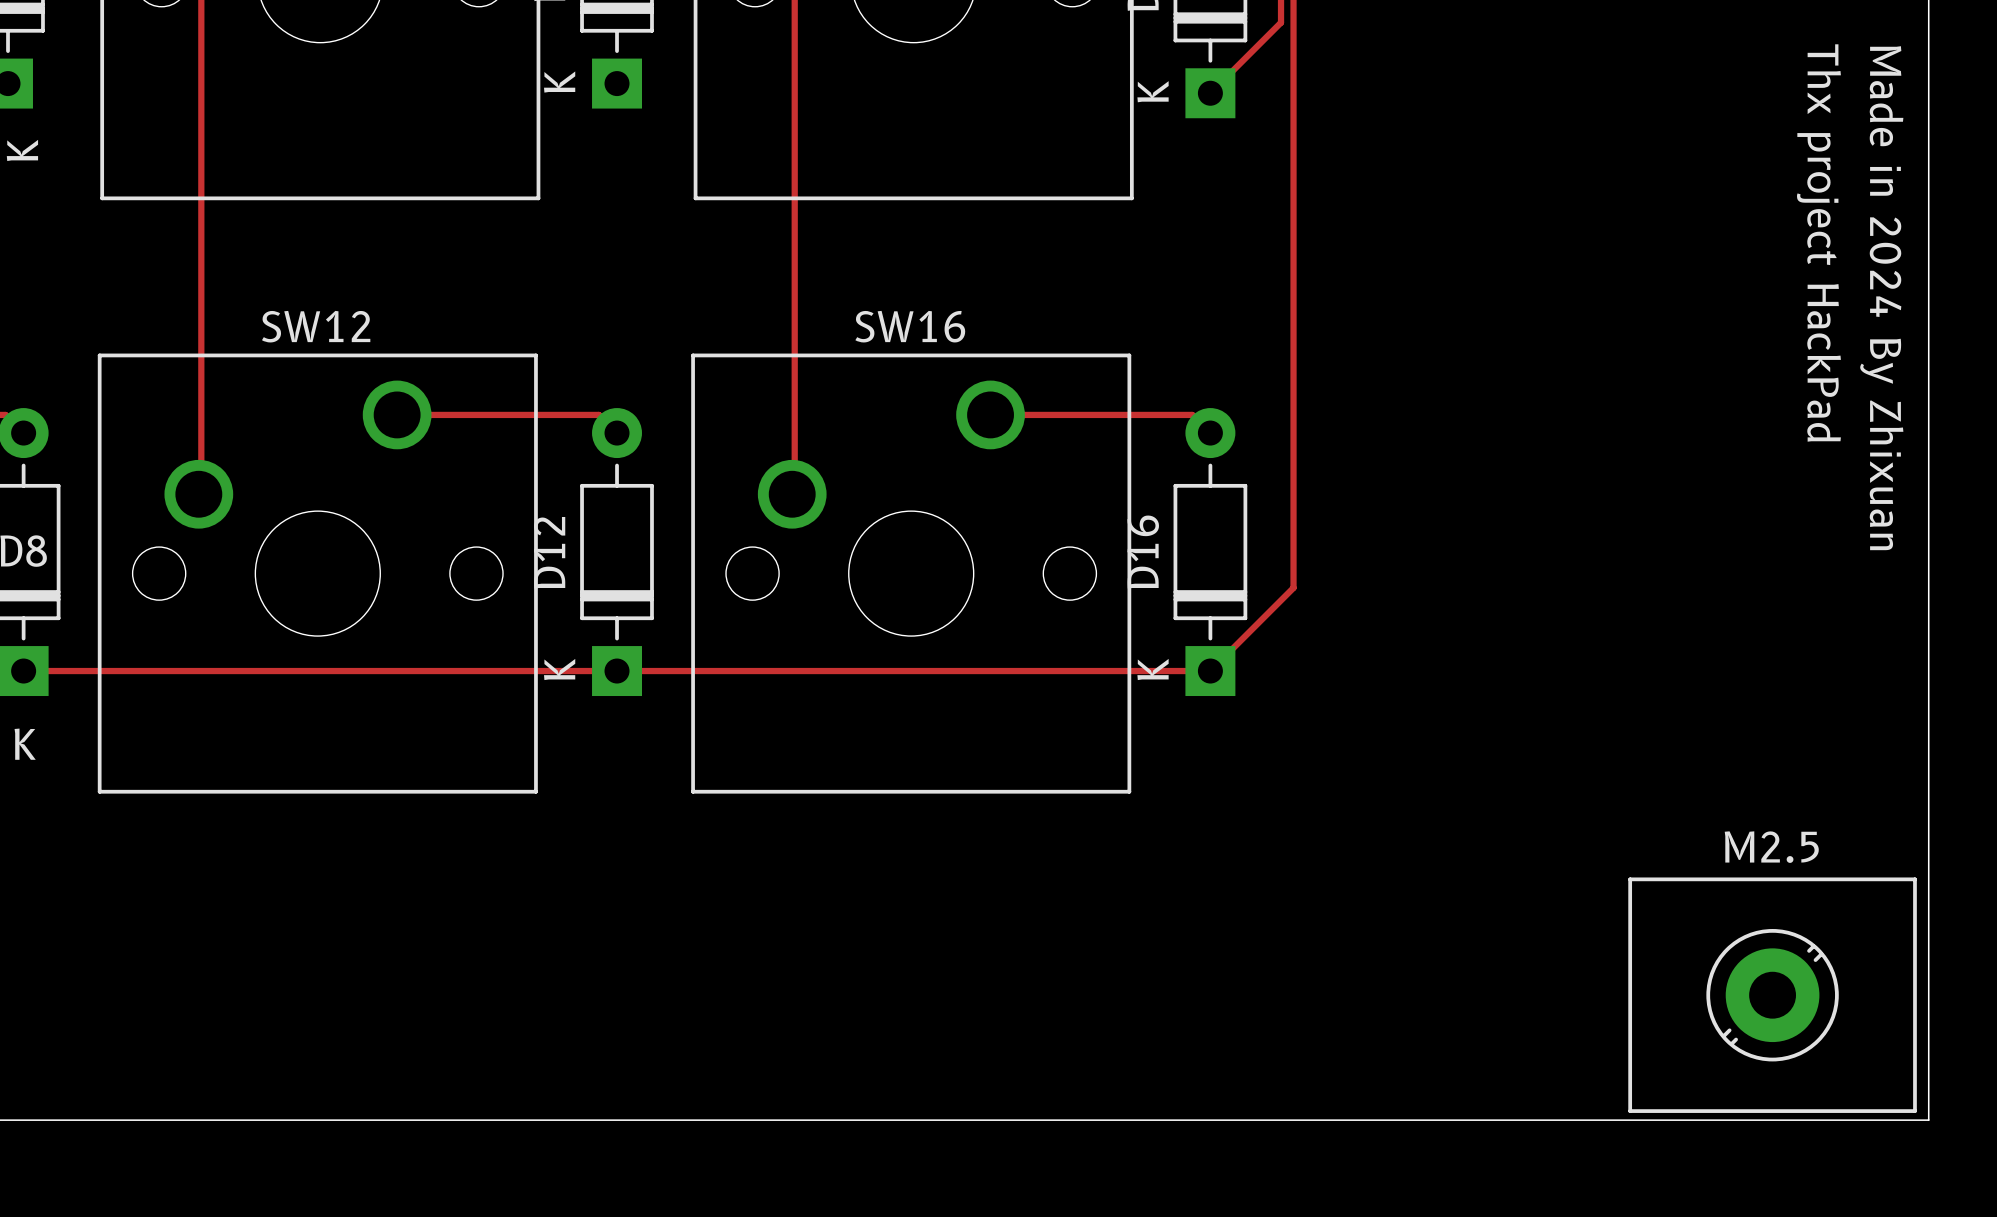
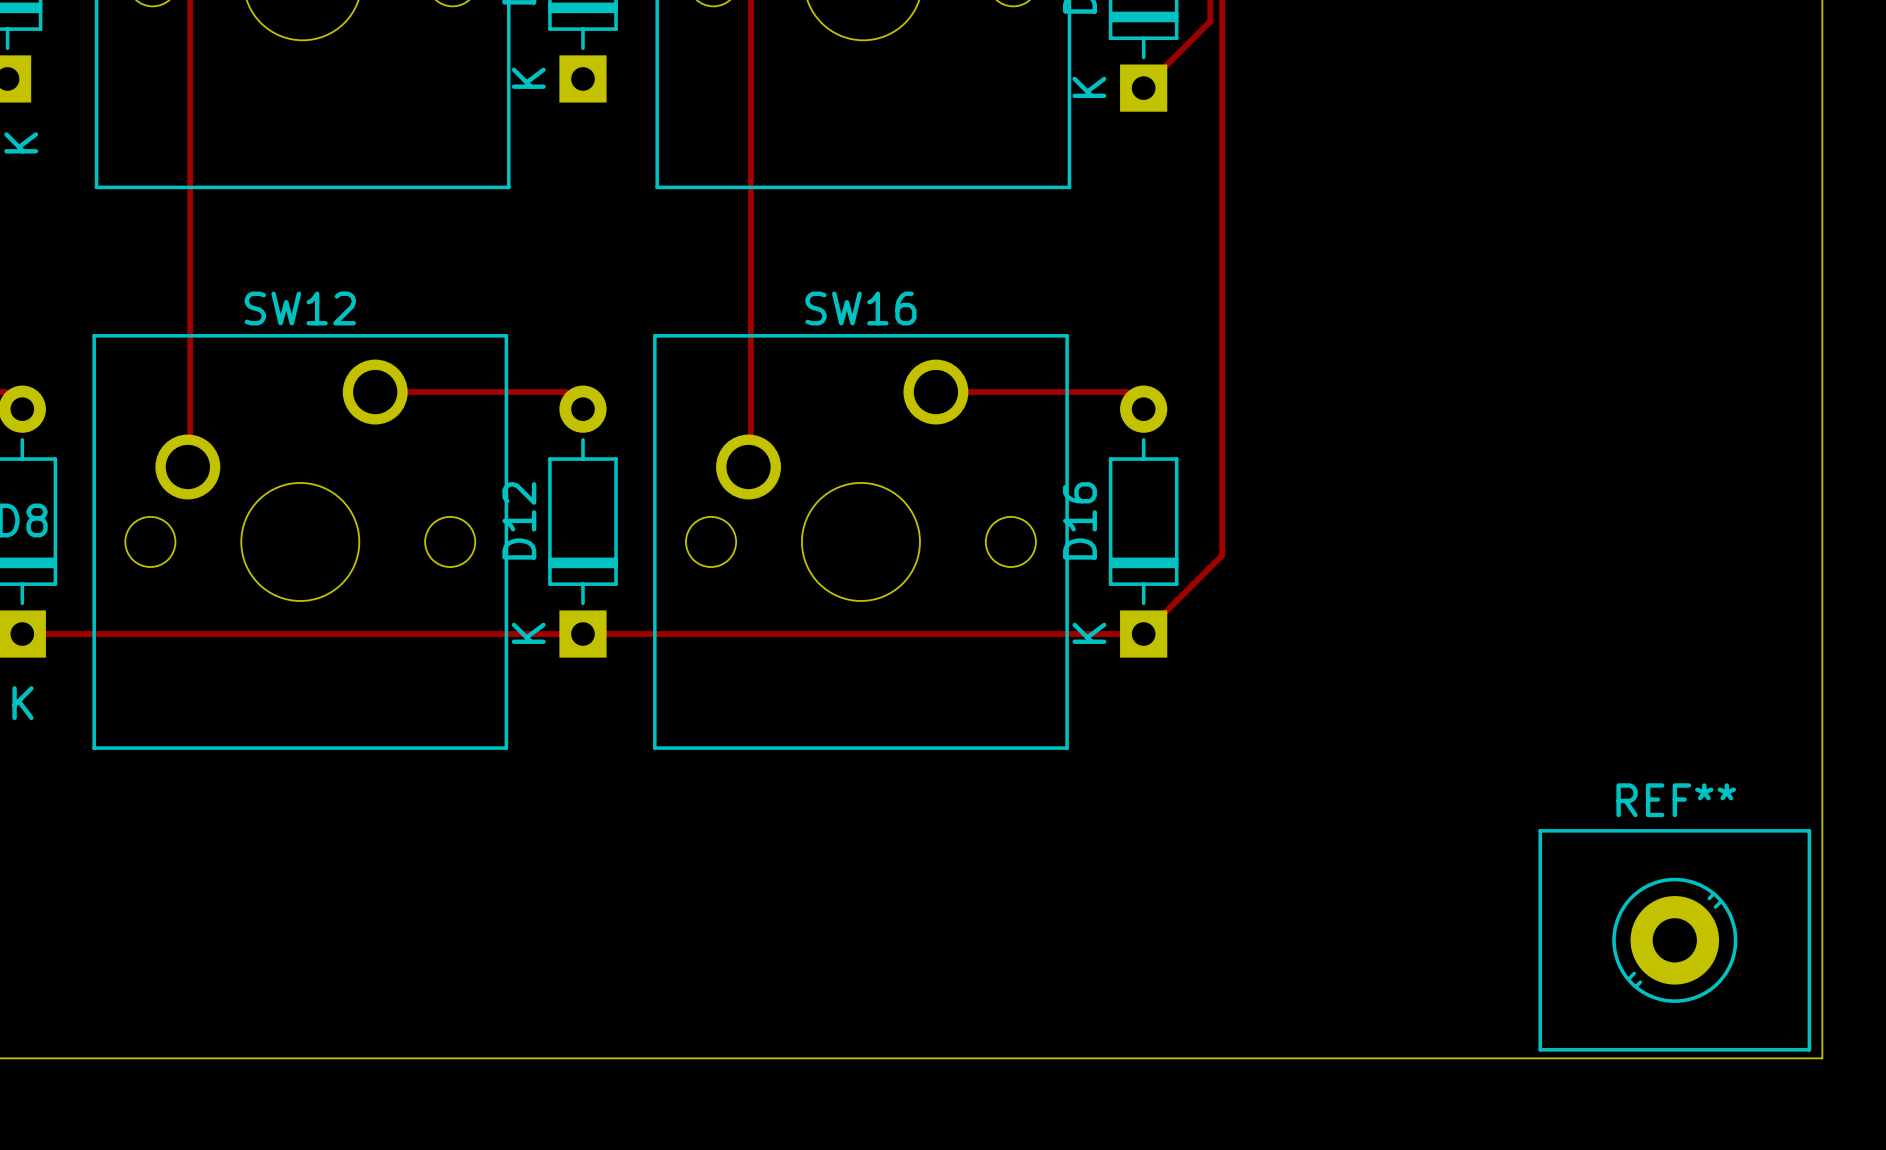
text: Thx project HackPad (1818, 242) -> none
text: Made in 2024 By Zhixuan (1881, 298) -> none
M2.5 name: M2.5 (1771, 847) -> REF** (1676, 800)

